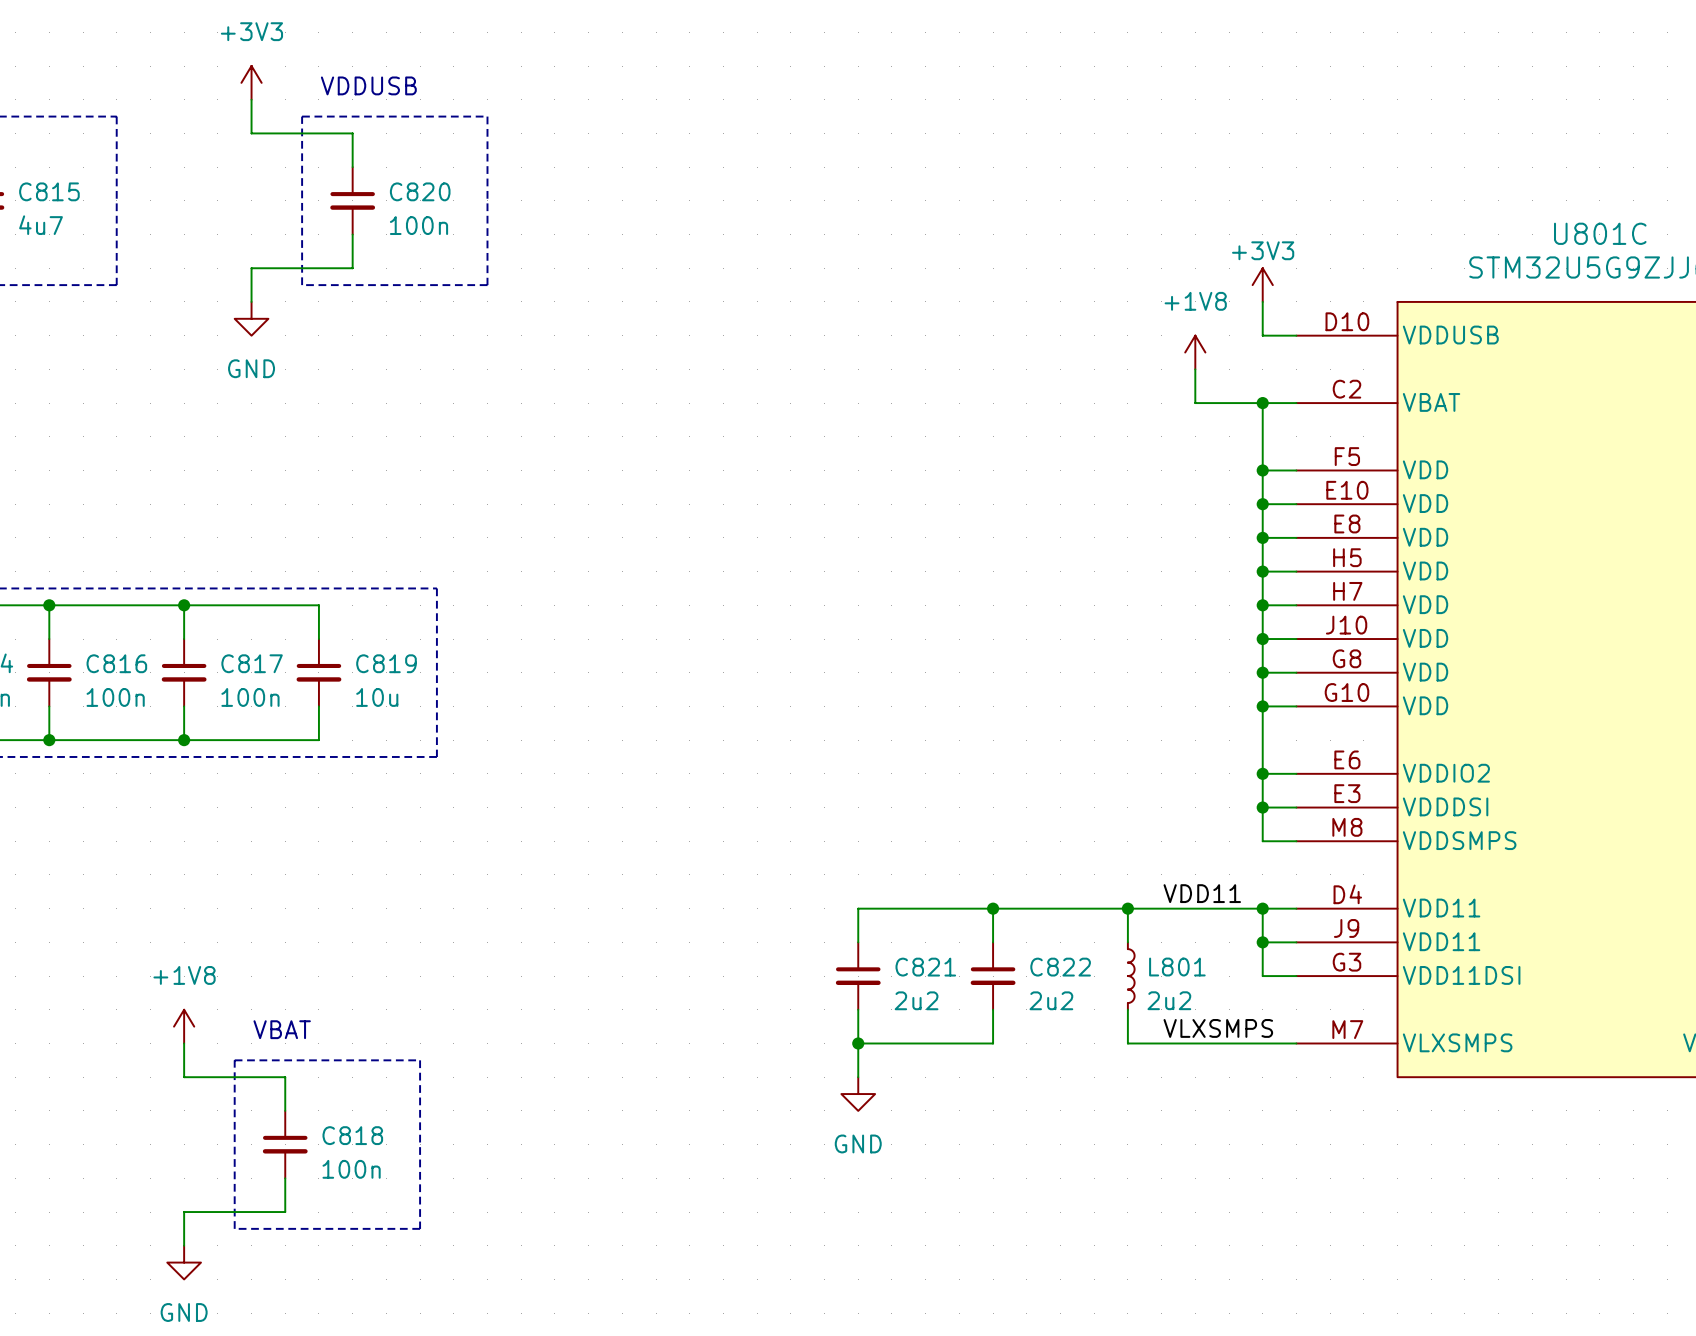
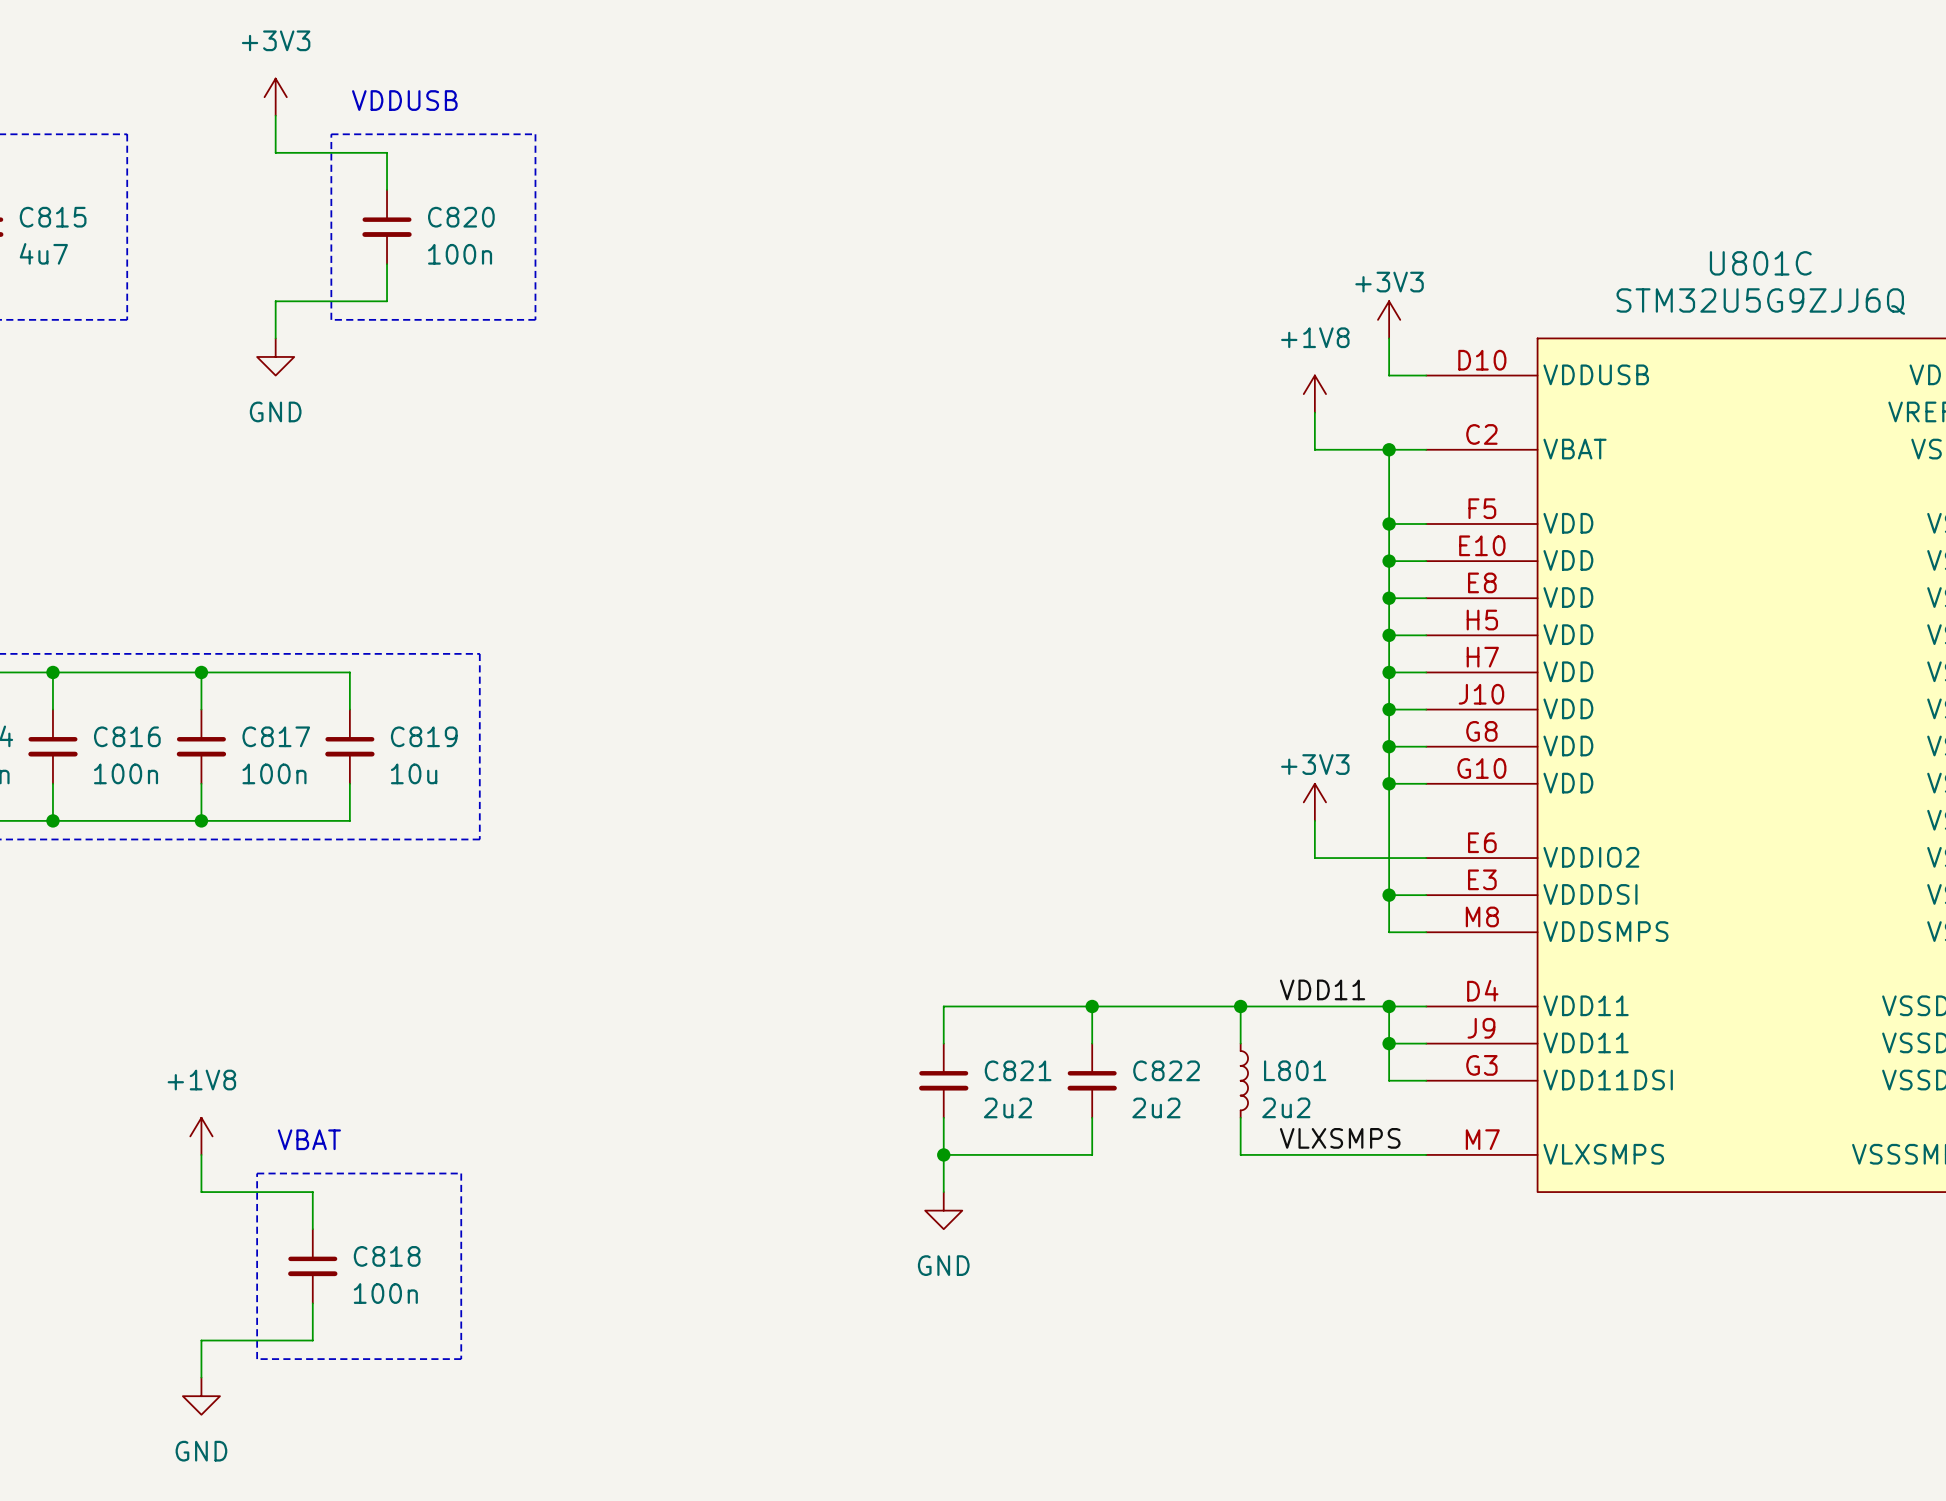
power symbol: none -> +3V3 (1314, 802)
wire: none -> (1314, 820) (1314, 858) (1389, 858)
junction: (1262, 773) -> none

